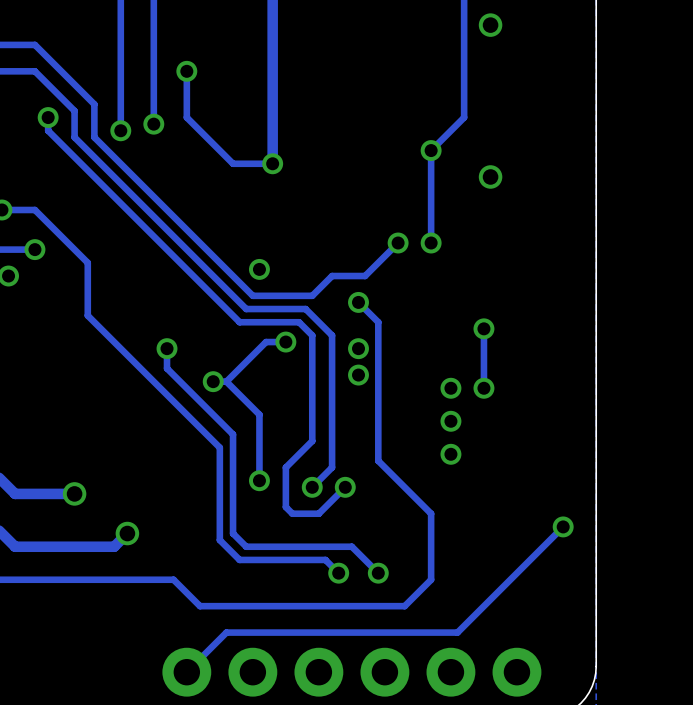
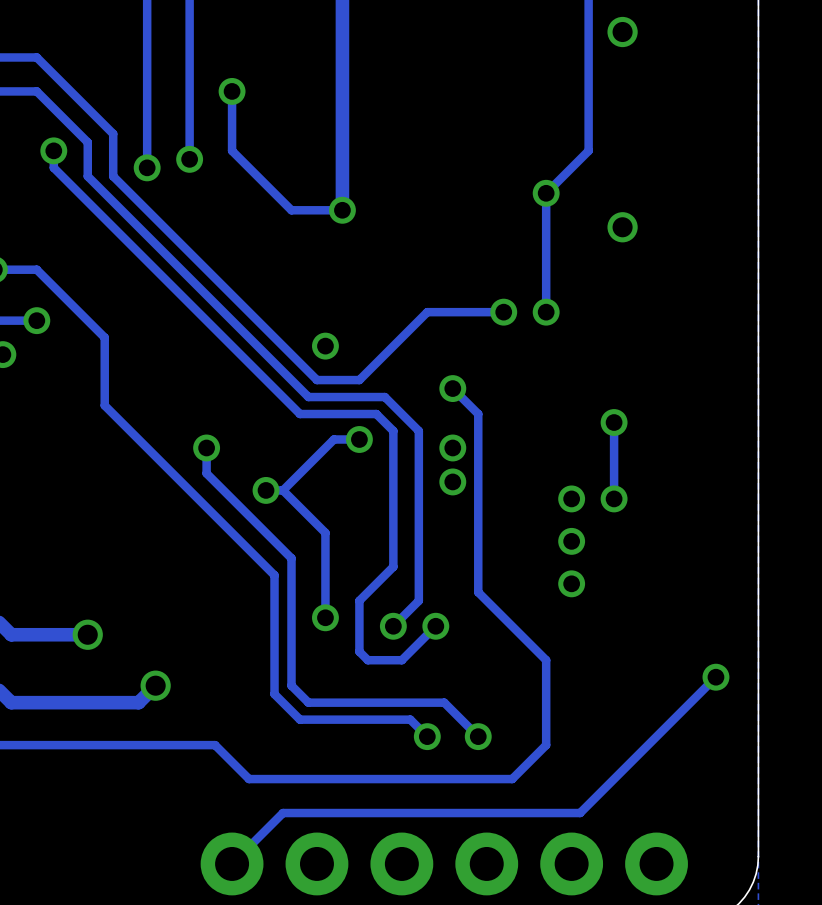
track: (398, 243) (365, 276) (332, 276) (312, 295) (285, 295) -> (503, 312) (427, 312) (359, 380)

